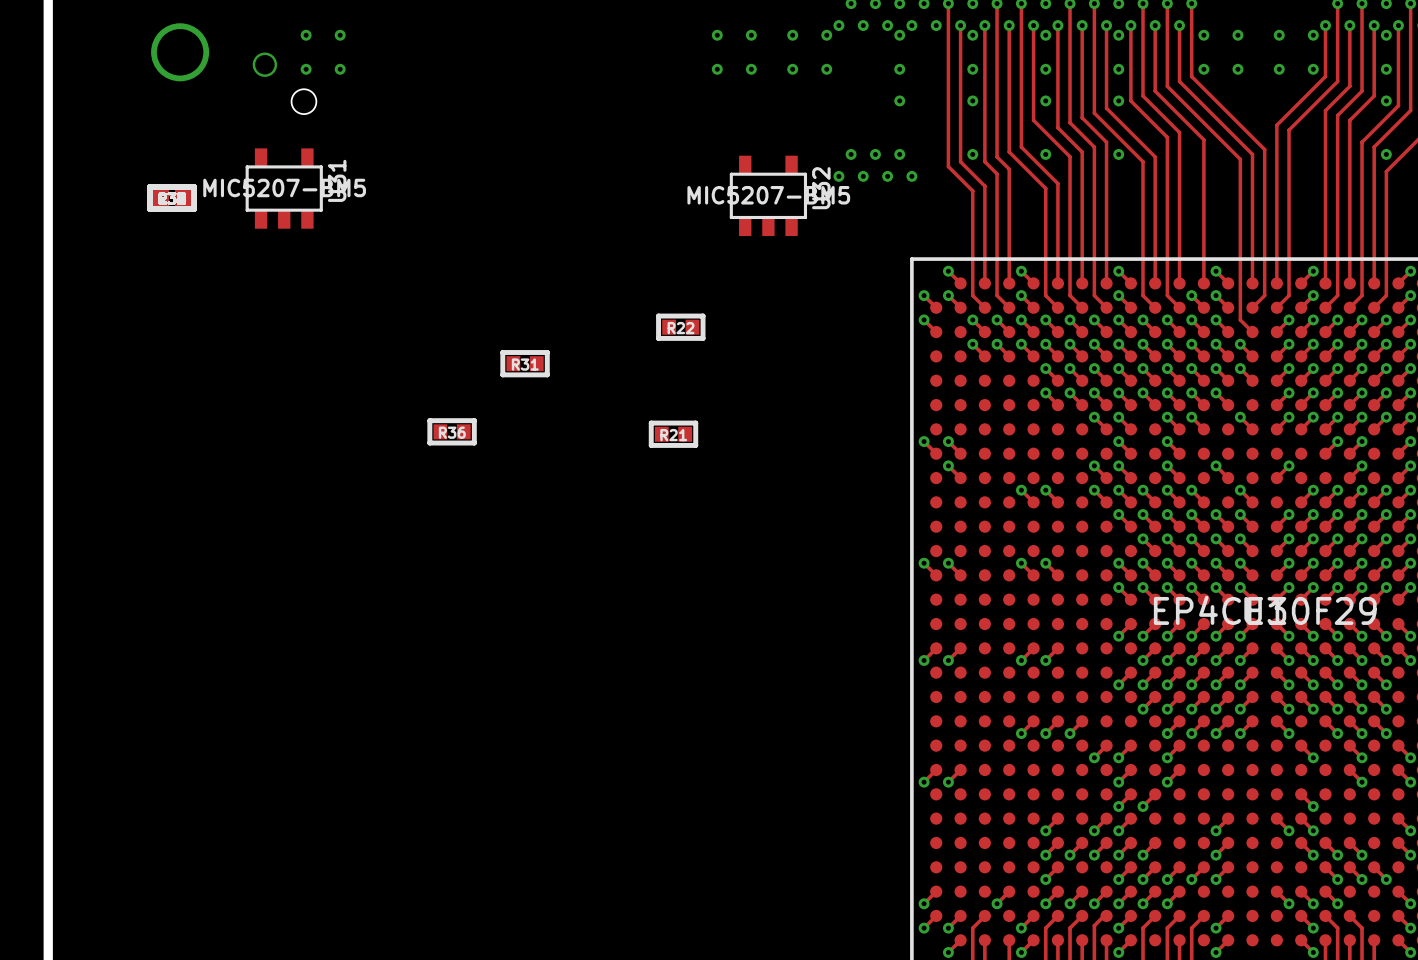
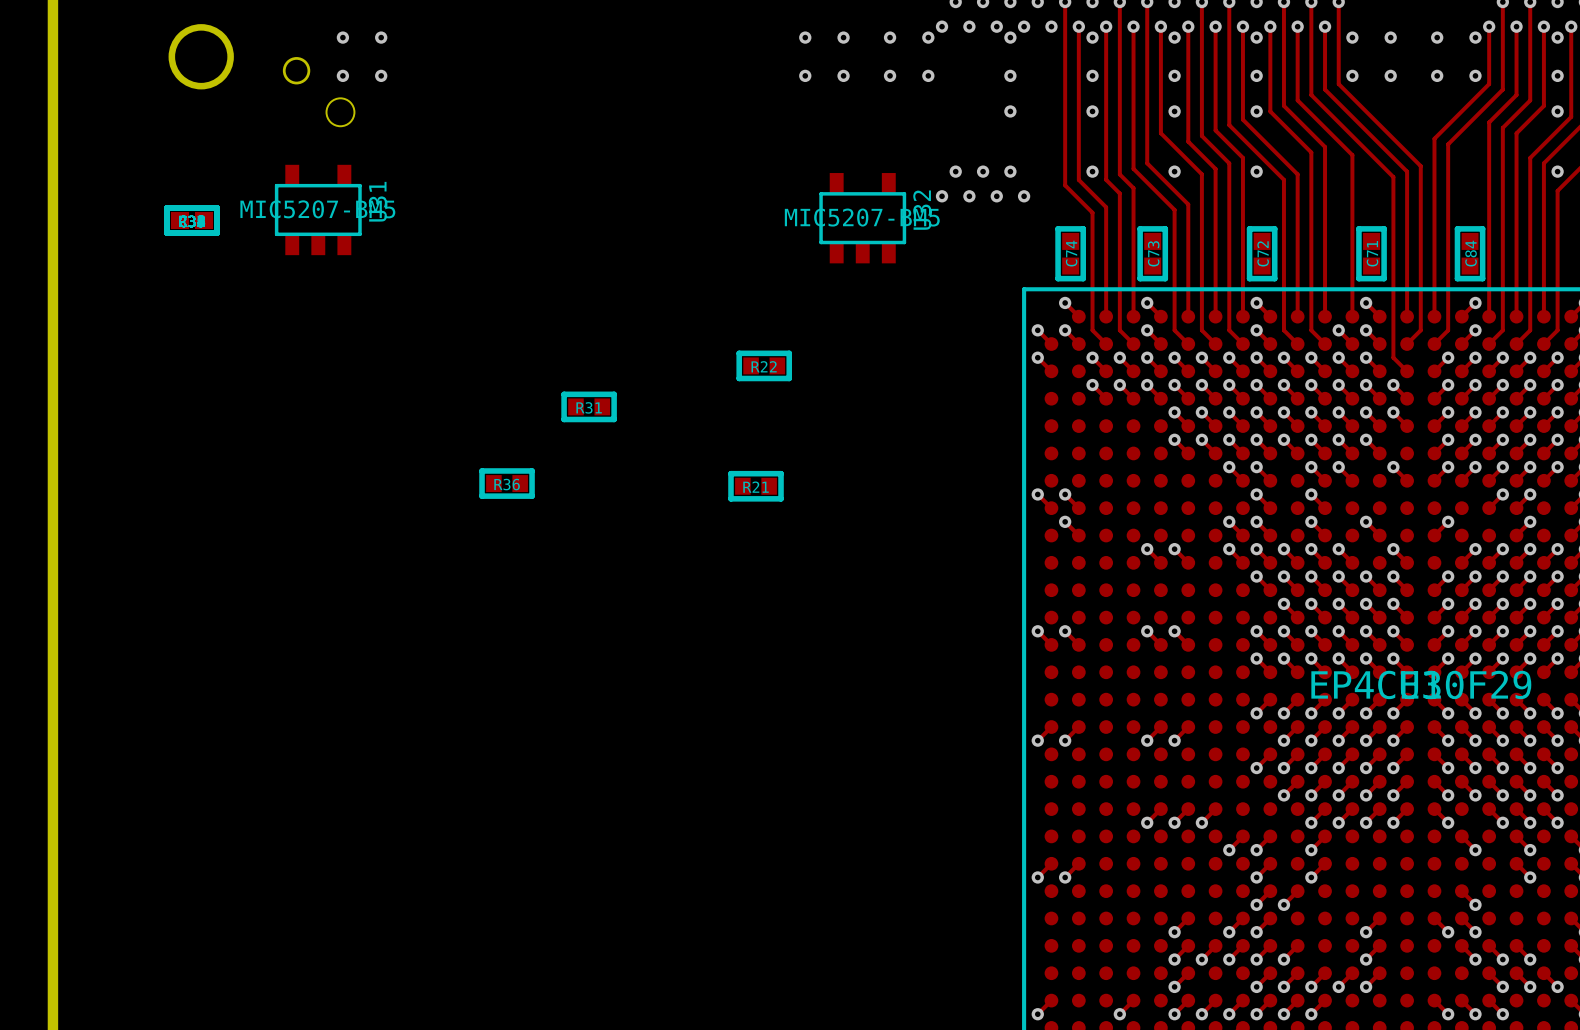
C74: none -> (1070, 253)
C73: none -> (1152, 253)
C72: none -> (1262, 253)
C71: none -> (1371, 253)
C84: none -> (1470, 253)

